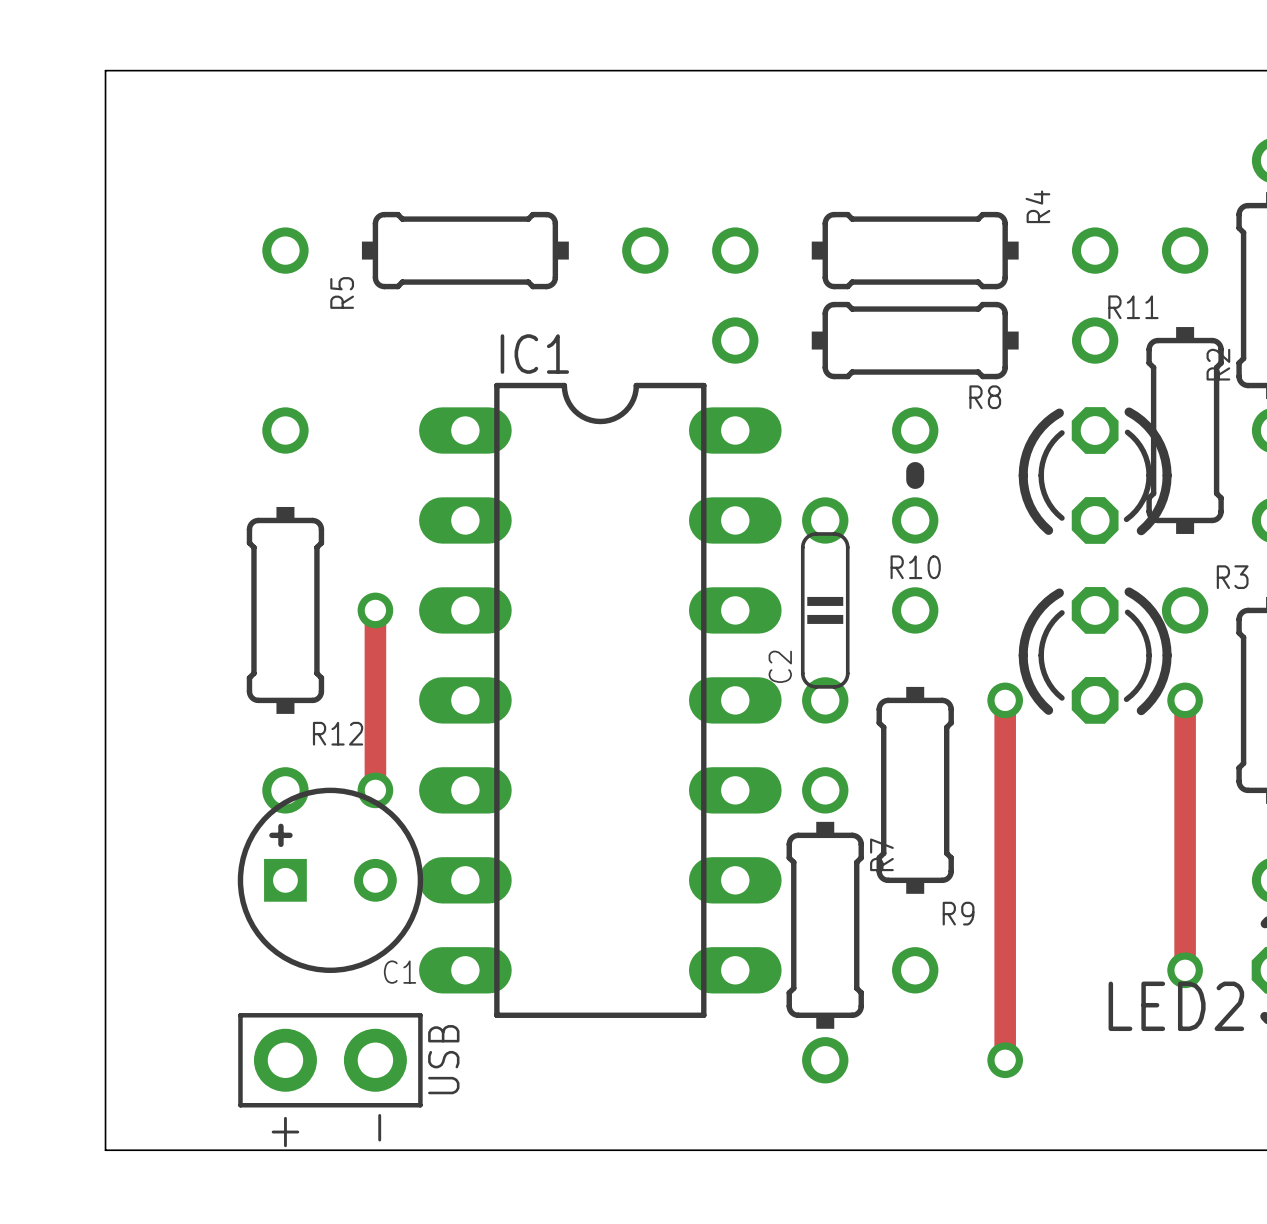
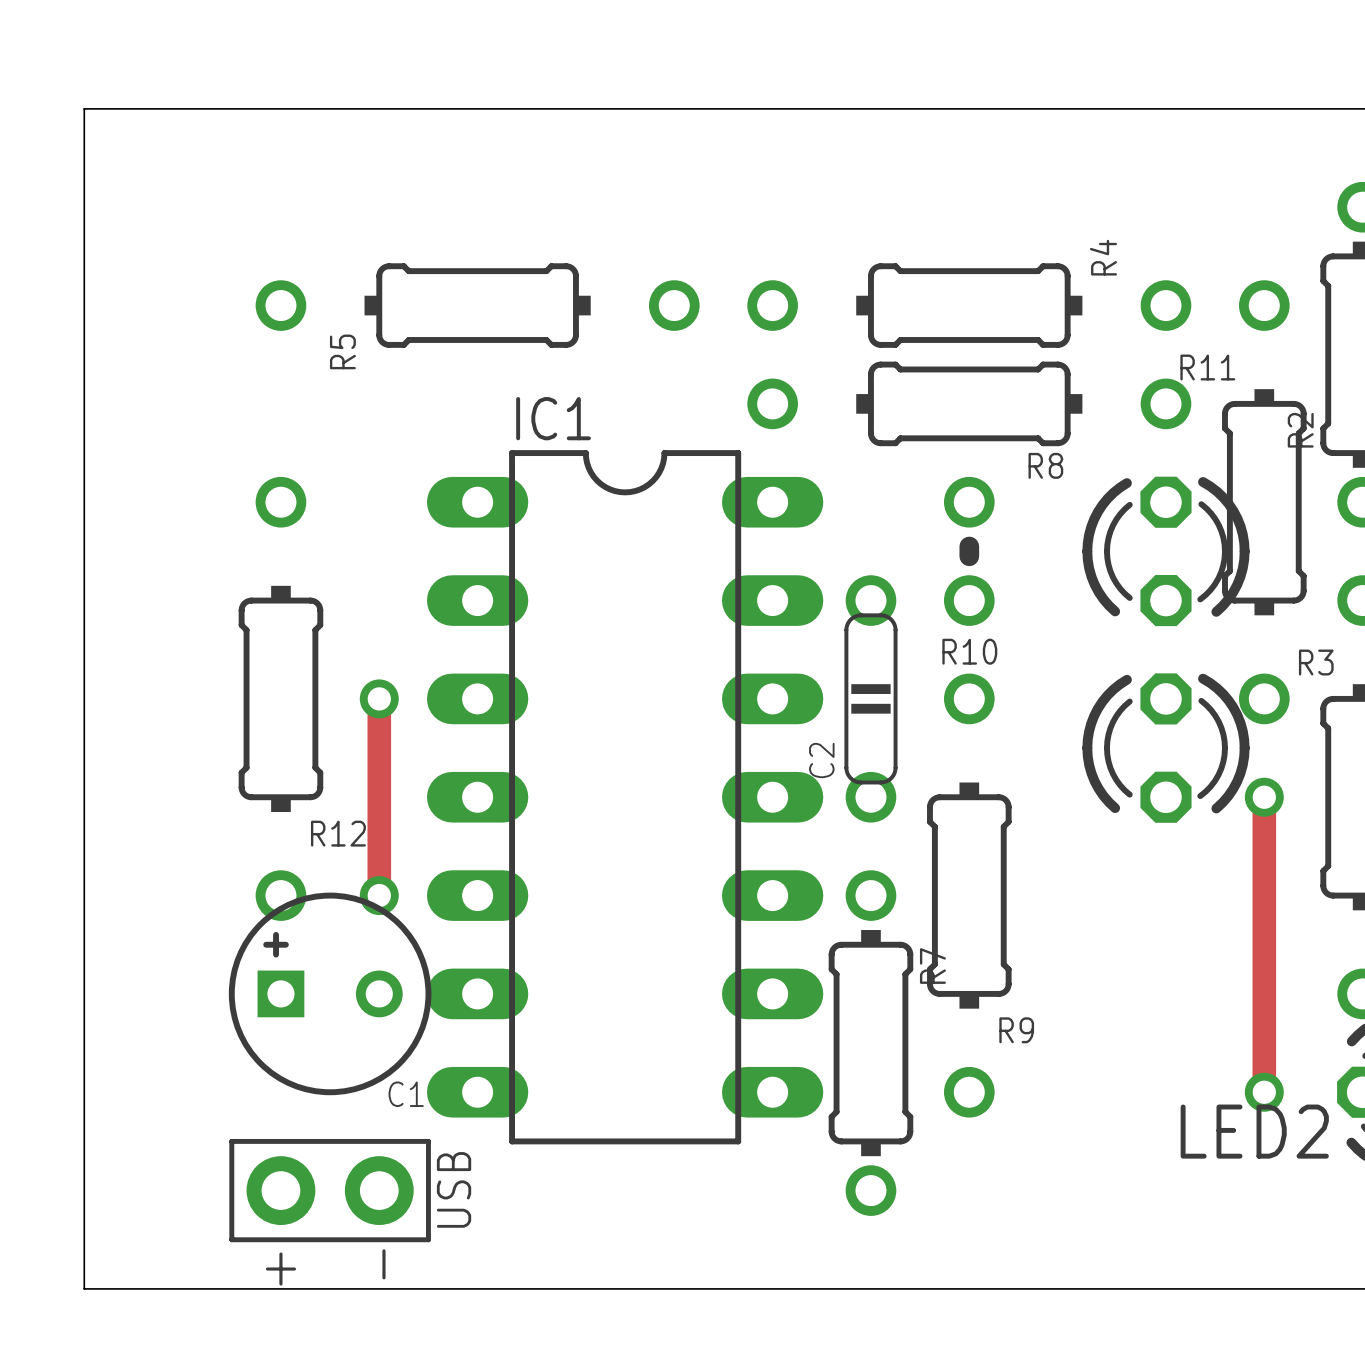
track: (1005, 700) (1005, 1060) -> none
via: (1005, 700) -> none
via: (1005, 1060) -> none

